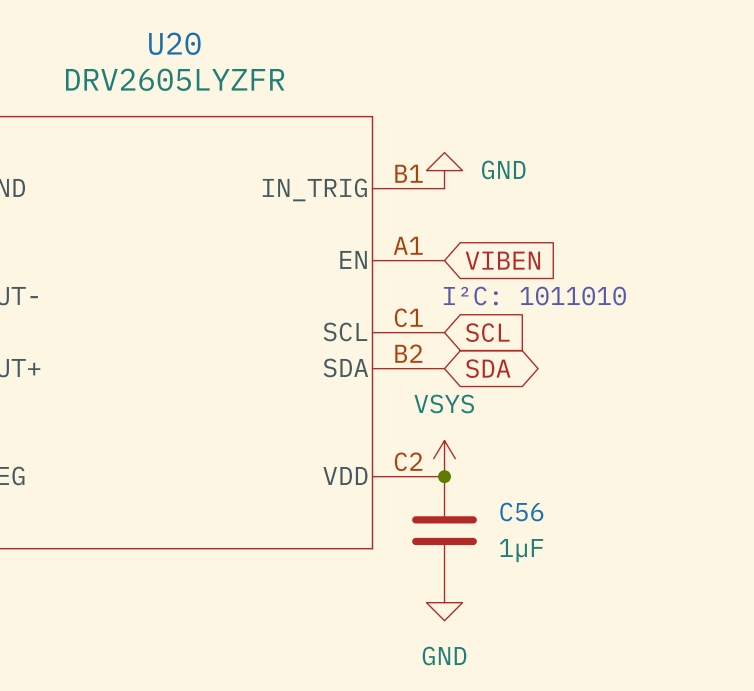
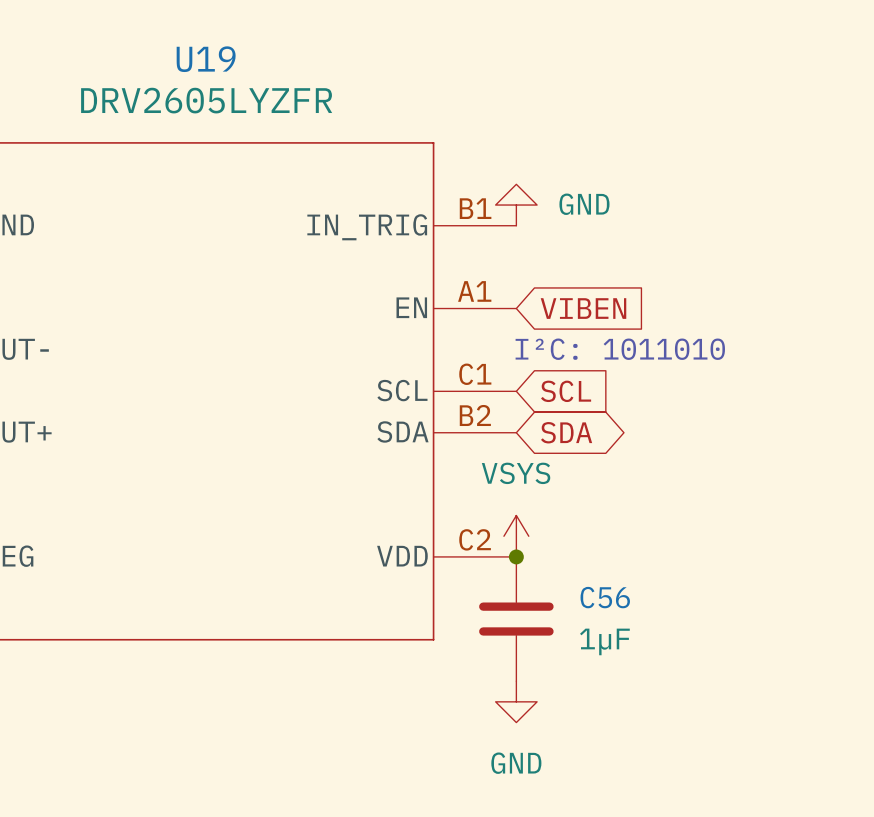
U20 name: U20 (174, 43) -> U19 (206, 59)

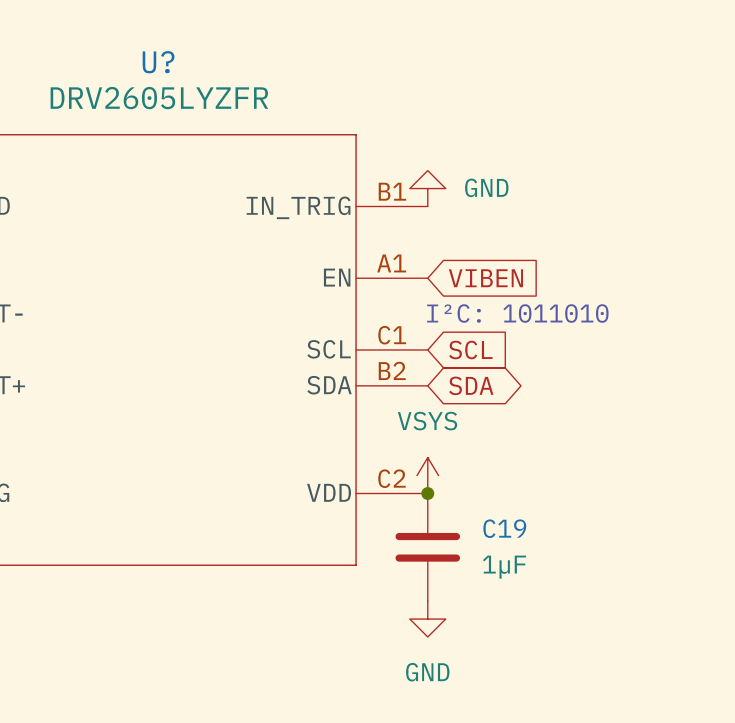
U19 name: U19 (206, 59) -> U? (158, 62)
C56 name: C56 (605, 597) -> C19 (504, 528)

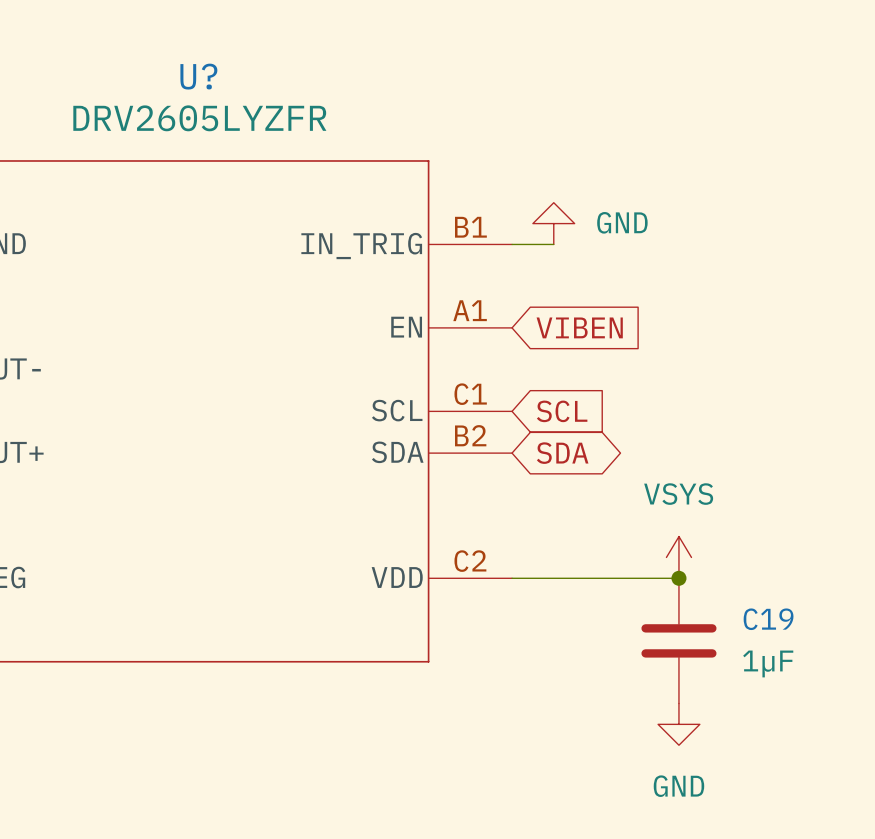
power symbol position: GND (427, 188) -> GND (553, 223)
wire: none -> (512, 244) (553, 244)
text: I²C: 1011010 (517, 313) -> none
power symbol position: VSYS (427, 475) -> VSYS (678, 557)
wire: none -> (512, 578) (678, 578)
junction: (427, 493) -> none
junction: none -> (678, 578)
C19 position: (427, 547) -> (678, 640)
power symbol position: GND (427, 619) -> GND (678, 724)

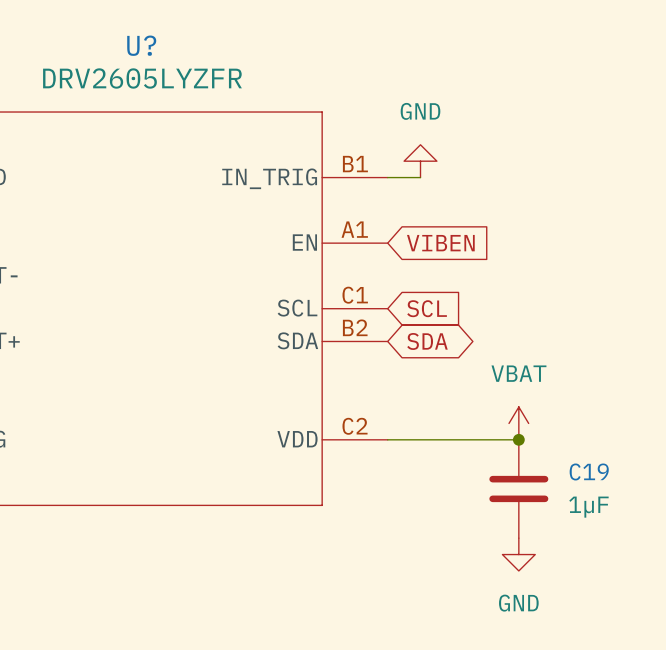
power symbol text position: GND (622, 222) -> GND (420, 111)
power symbol: VSYS (678, 557) -> VBAT (518, 423)

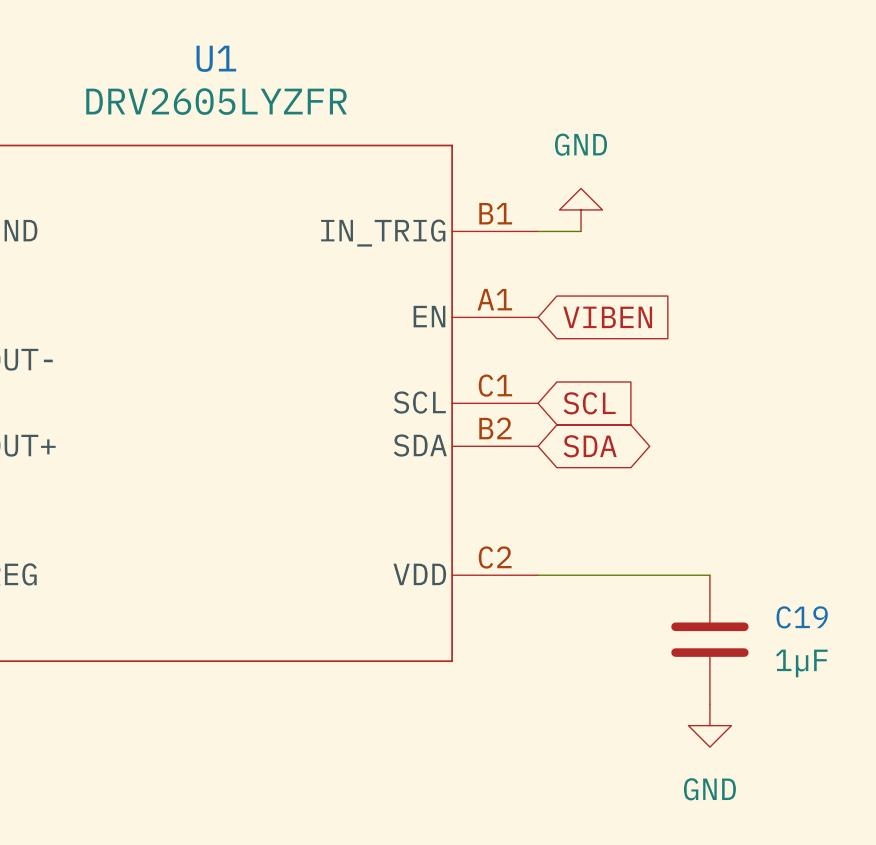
U? name: U? (141, 45) -> U1 (216, 58)
power symbol: VBAT (518, 423) -> none
junction: (518, 439) -> none

